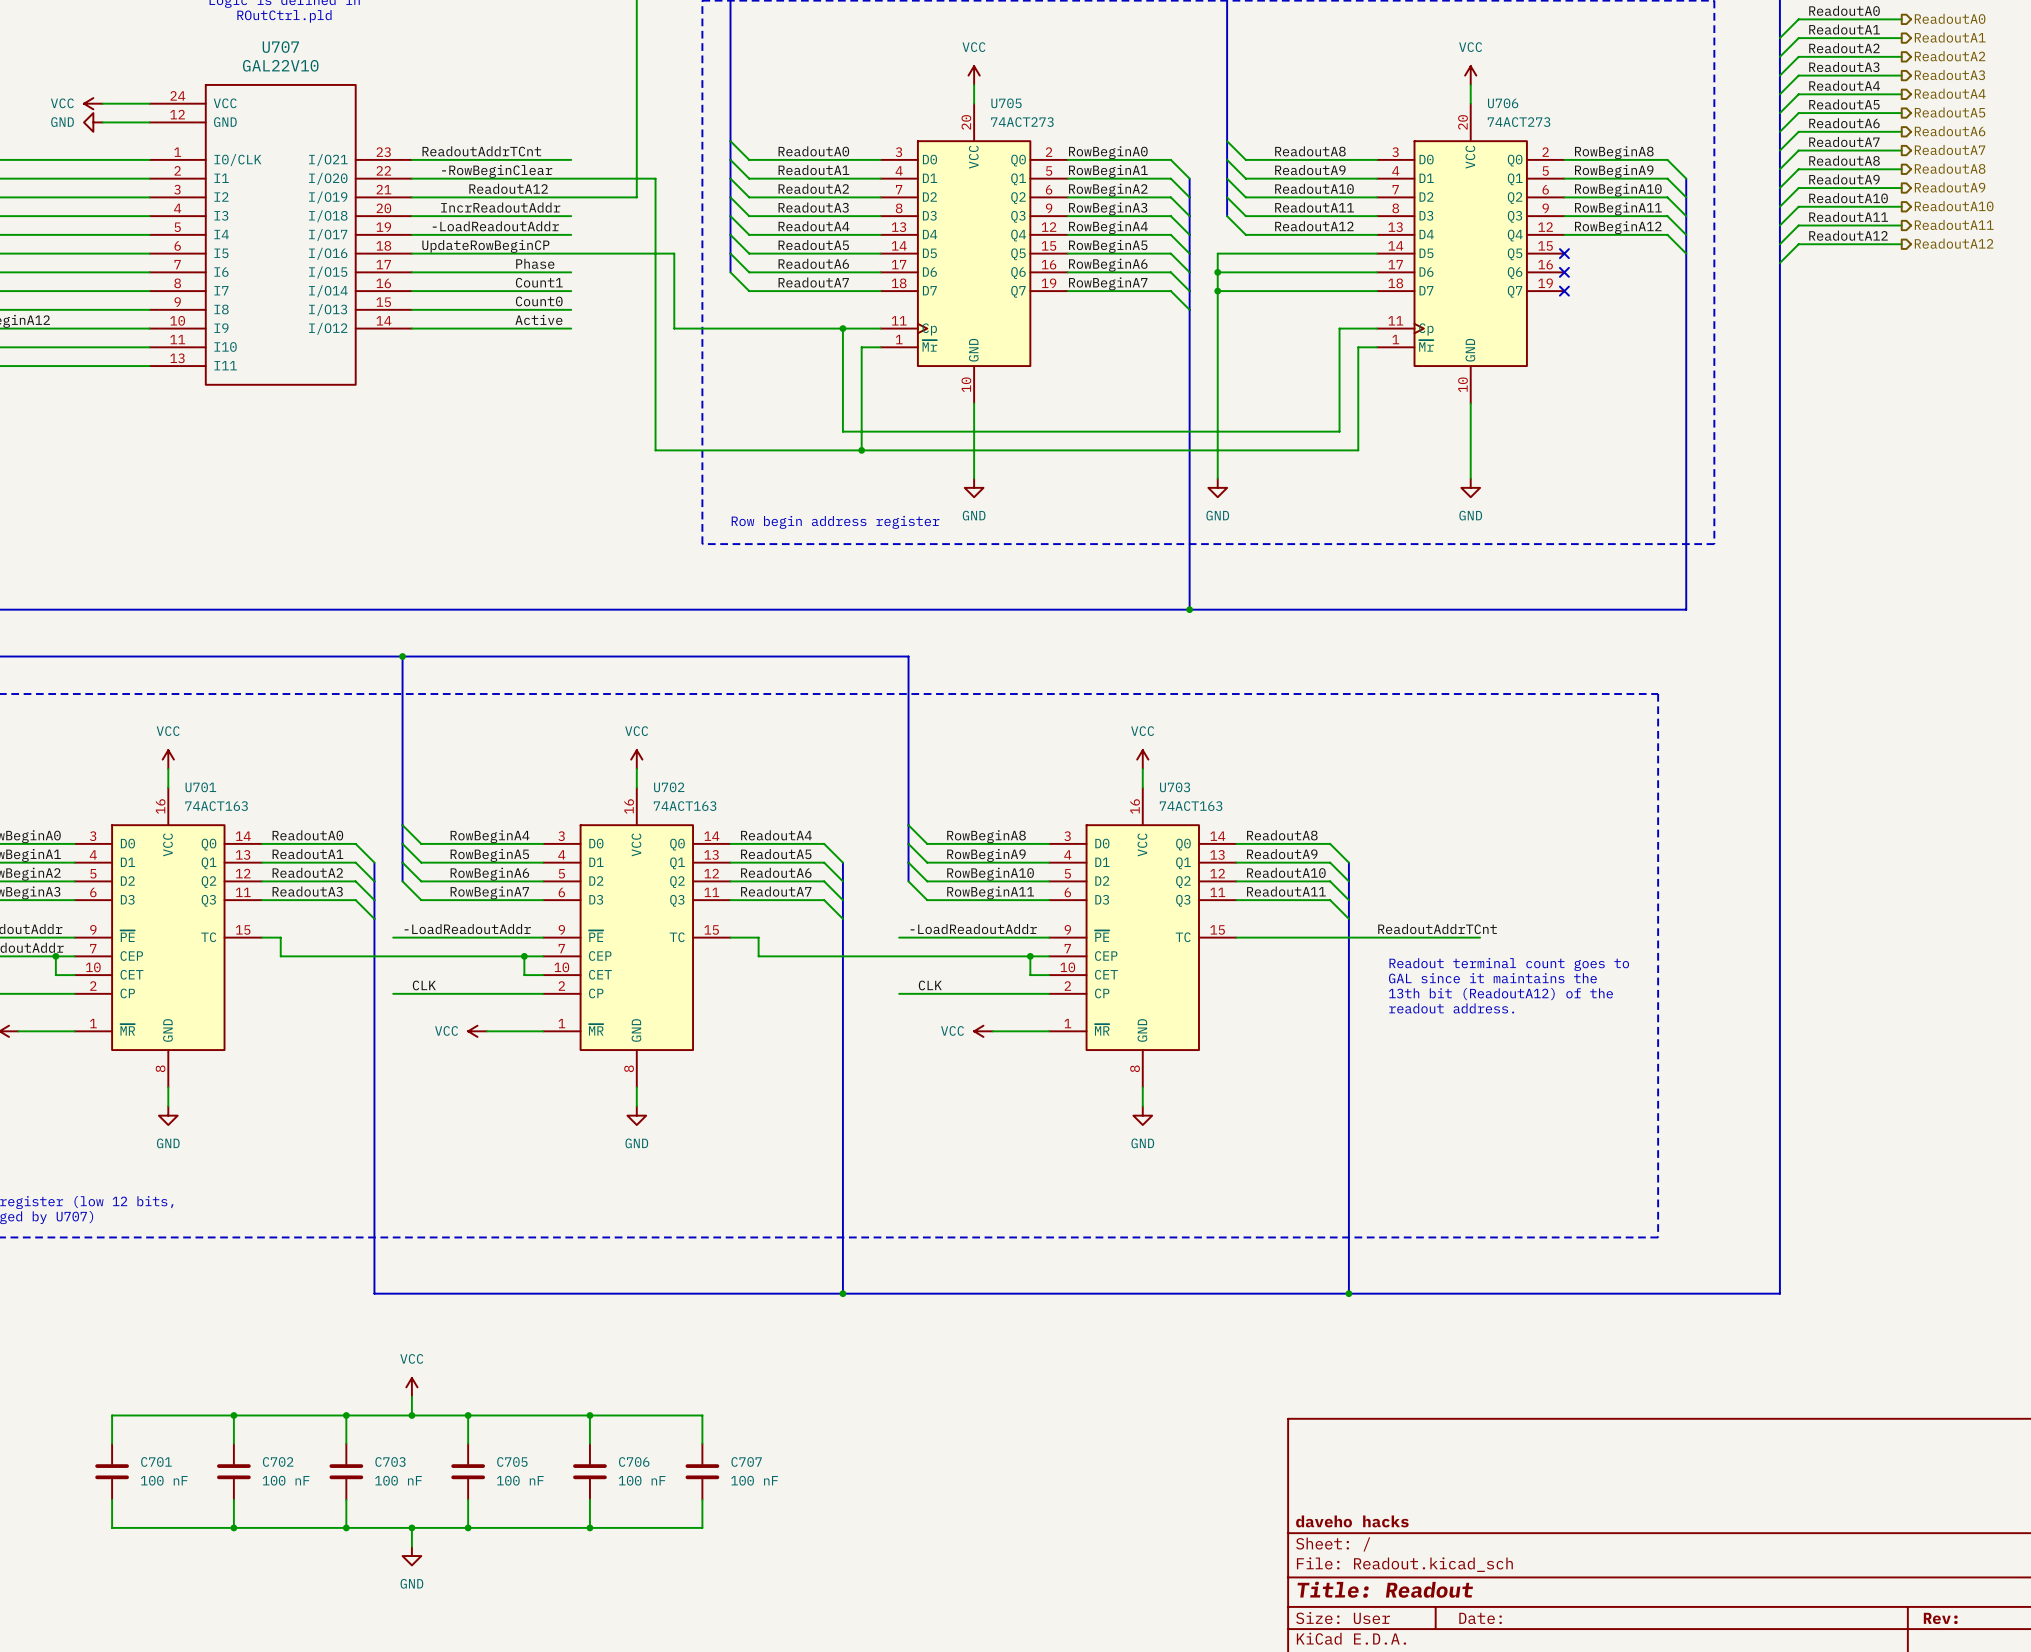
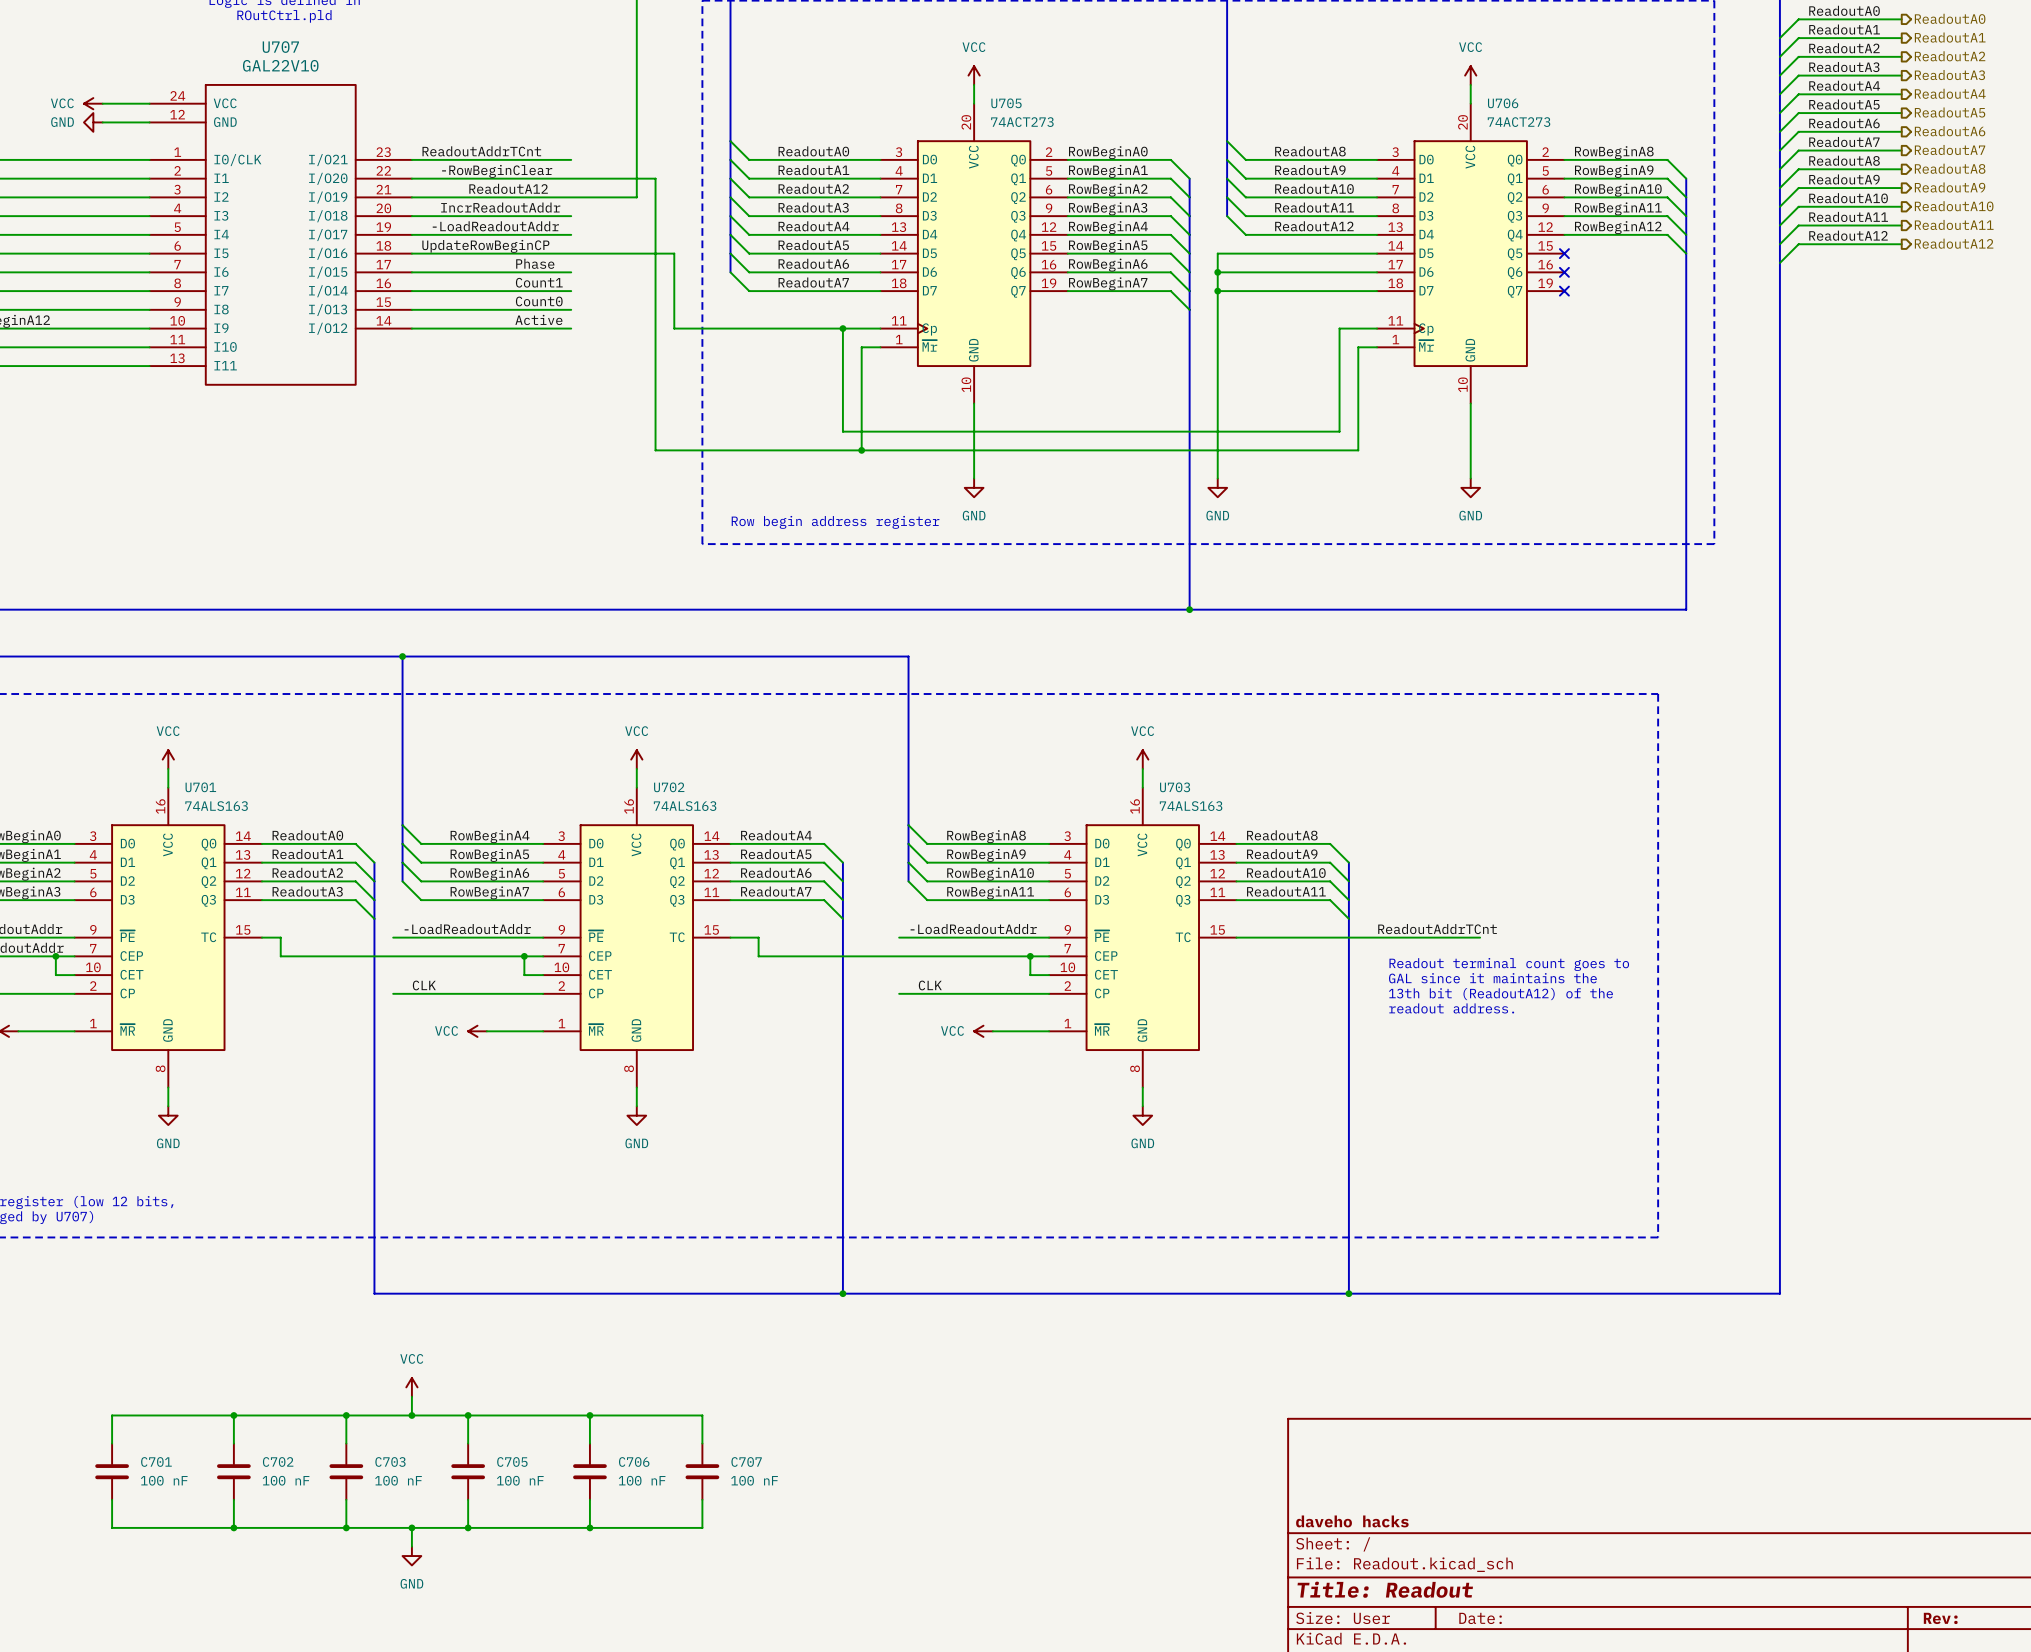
U701 value: 74ACT163 (216, 806) -> 74ALS163 (216, 806)
U702 value: 74ACT163 (685, 806) -> 74ALS163 (685, 806)
U703 value: 74ACT163 (1191, 806) -> 74ALS163 (1191, 806)

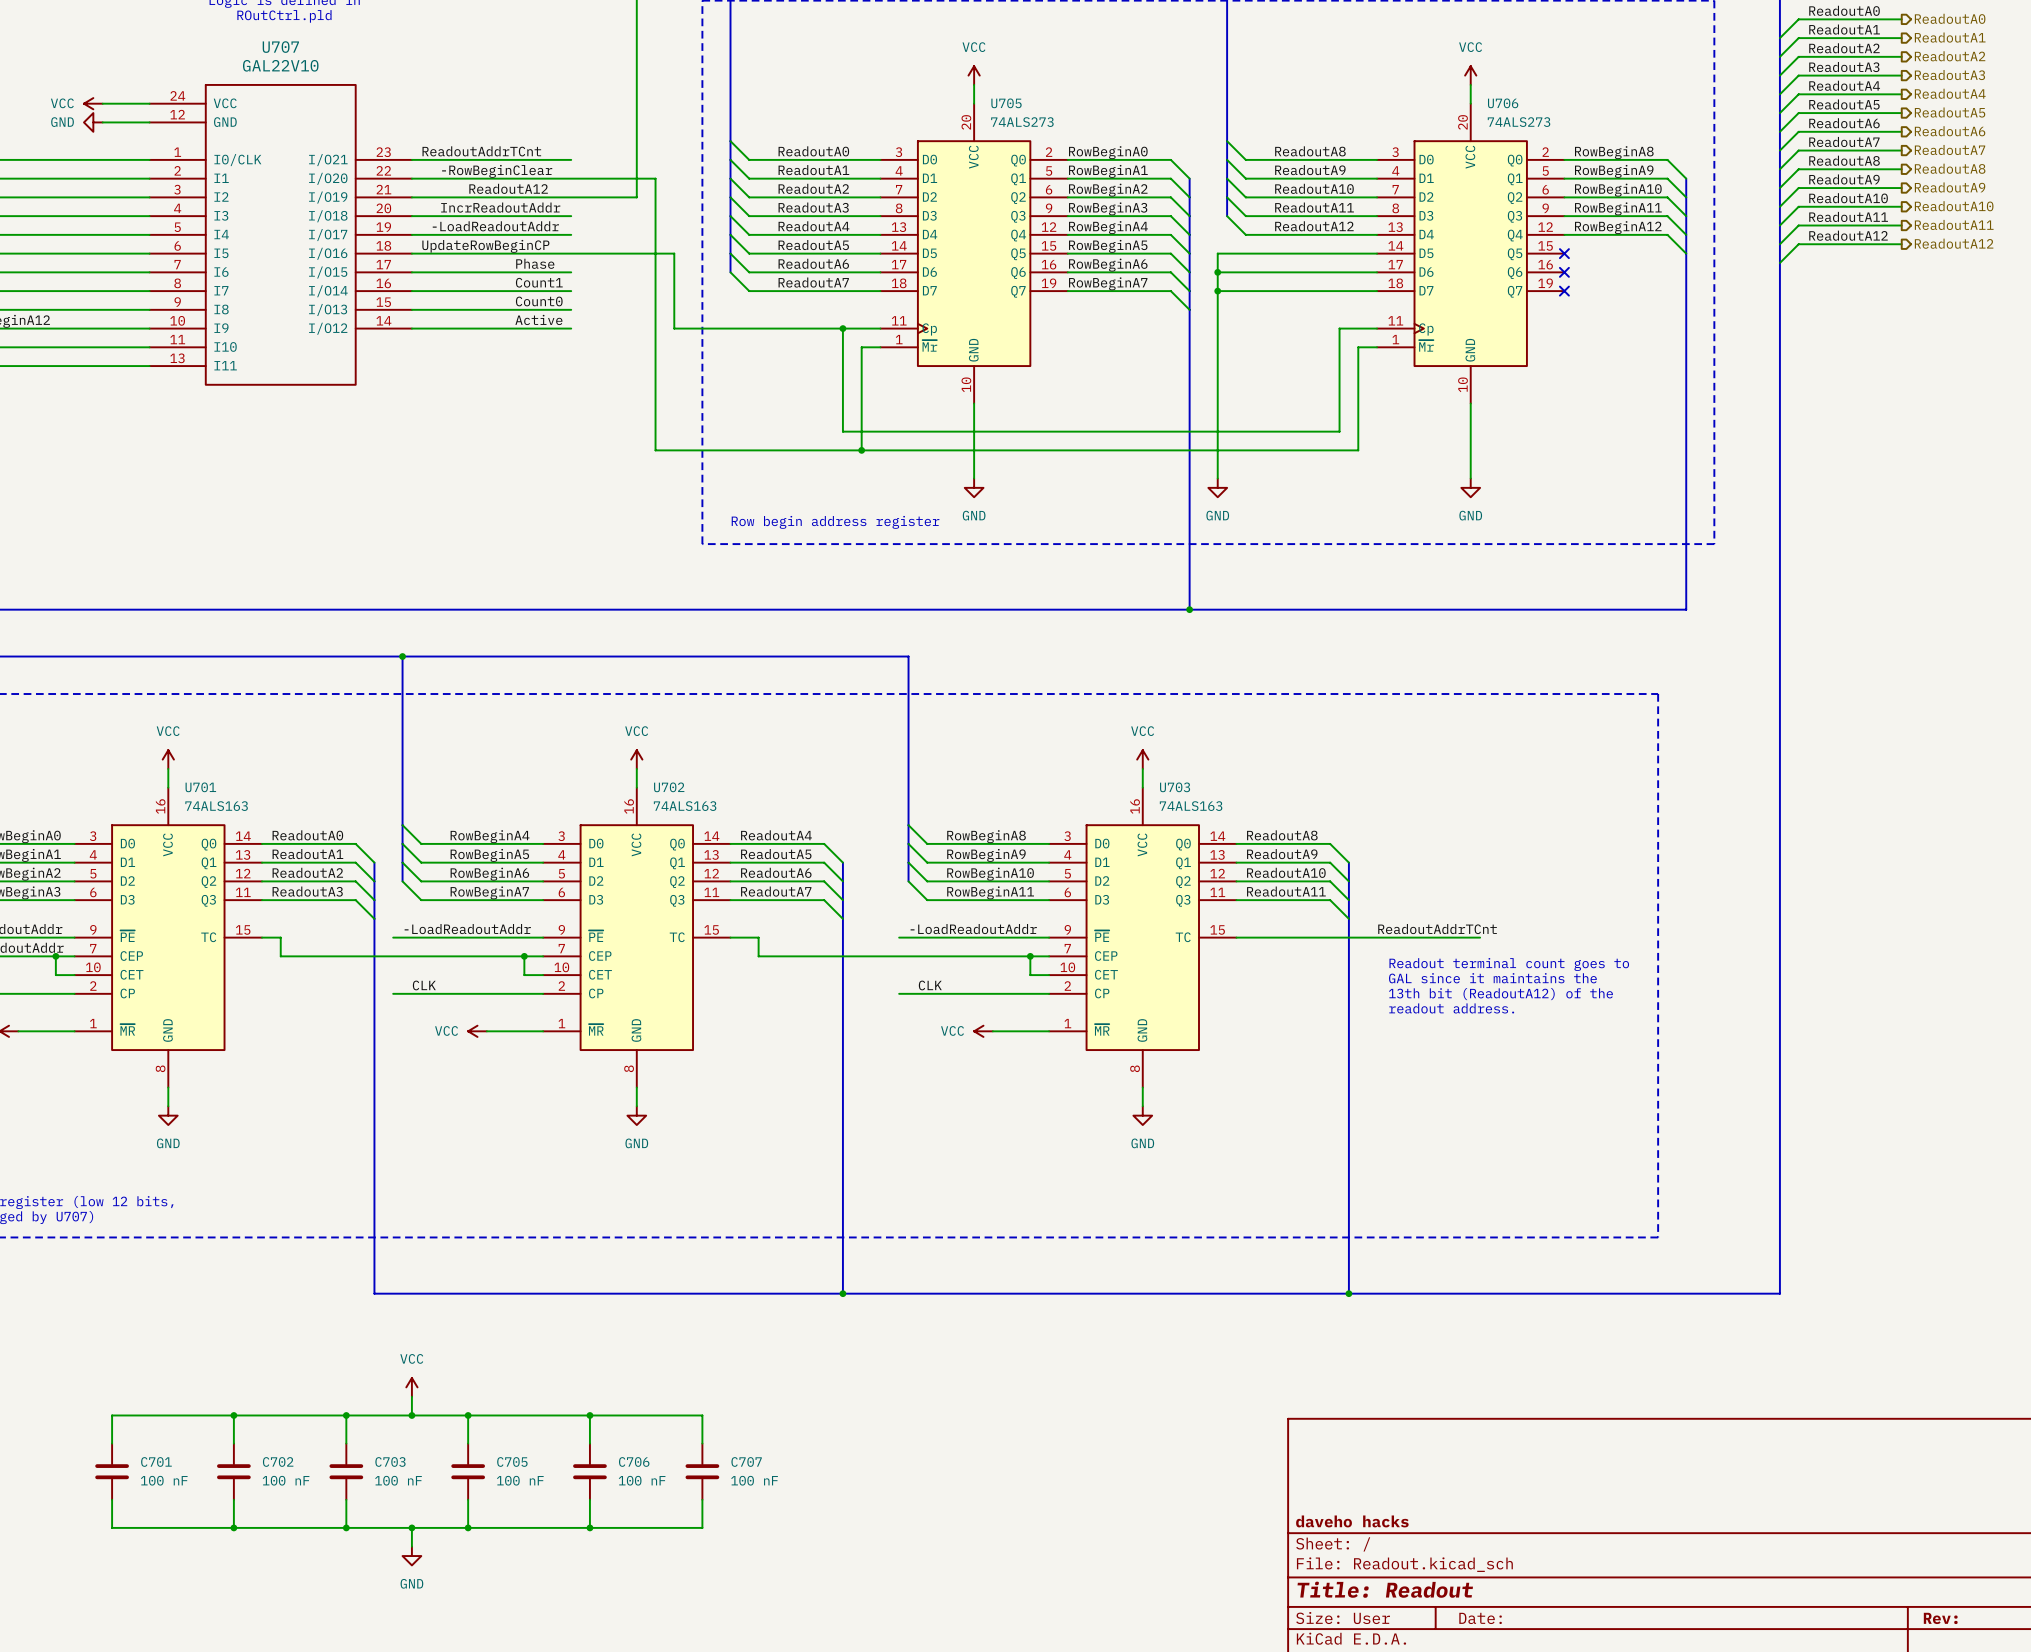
U705 value: 74ACT273 (1022, 122) -> 74ALS273 (1022, 122)
U706 value: 74ACT273 (1519, 122) -> 74ALS273 (1519, 122)

